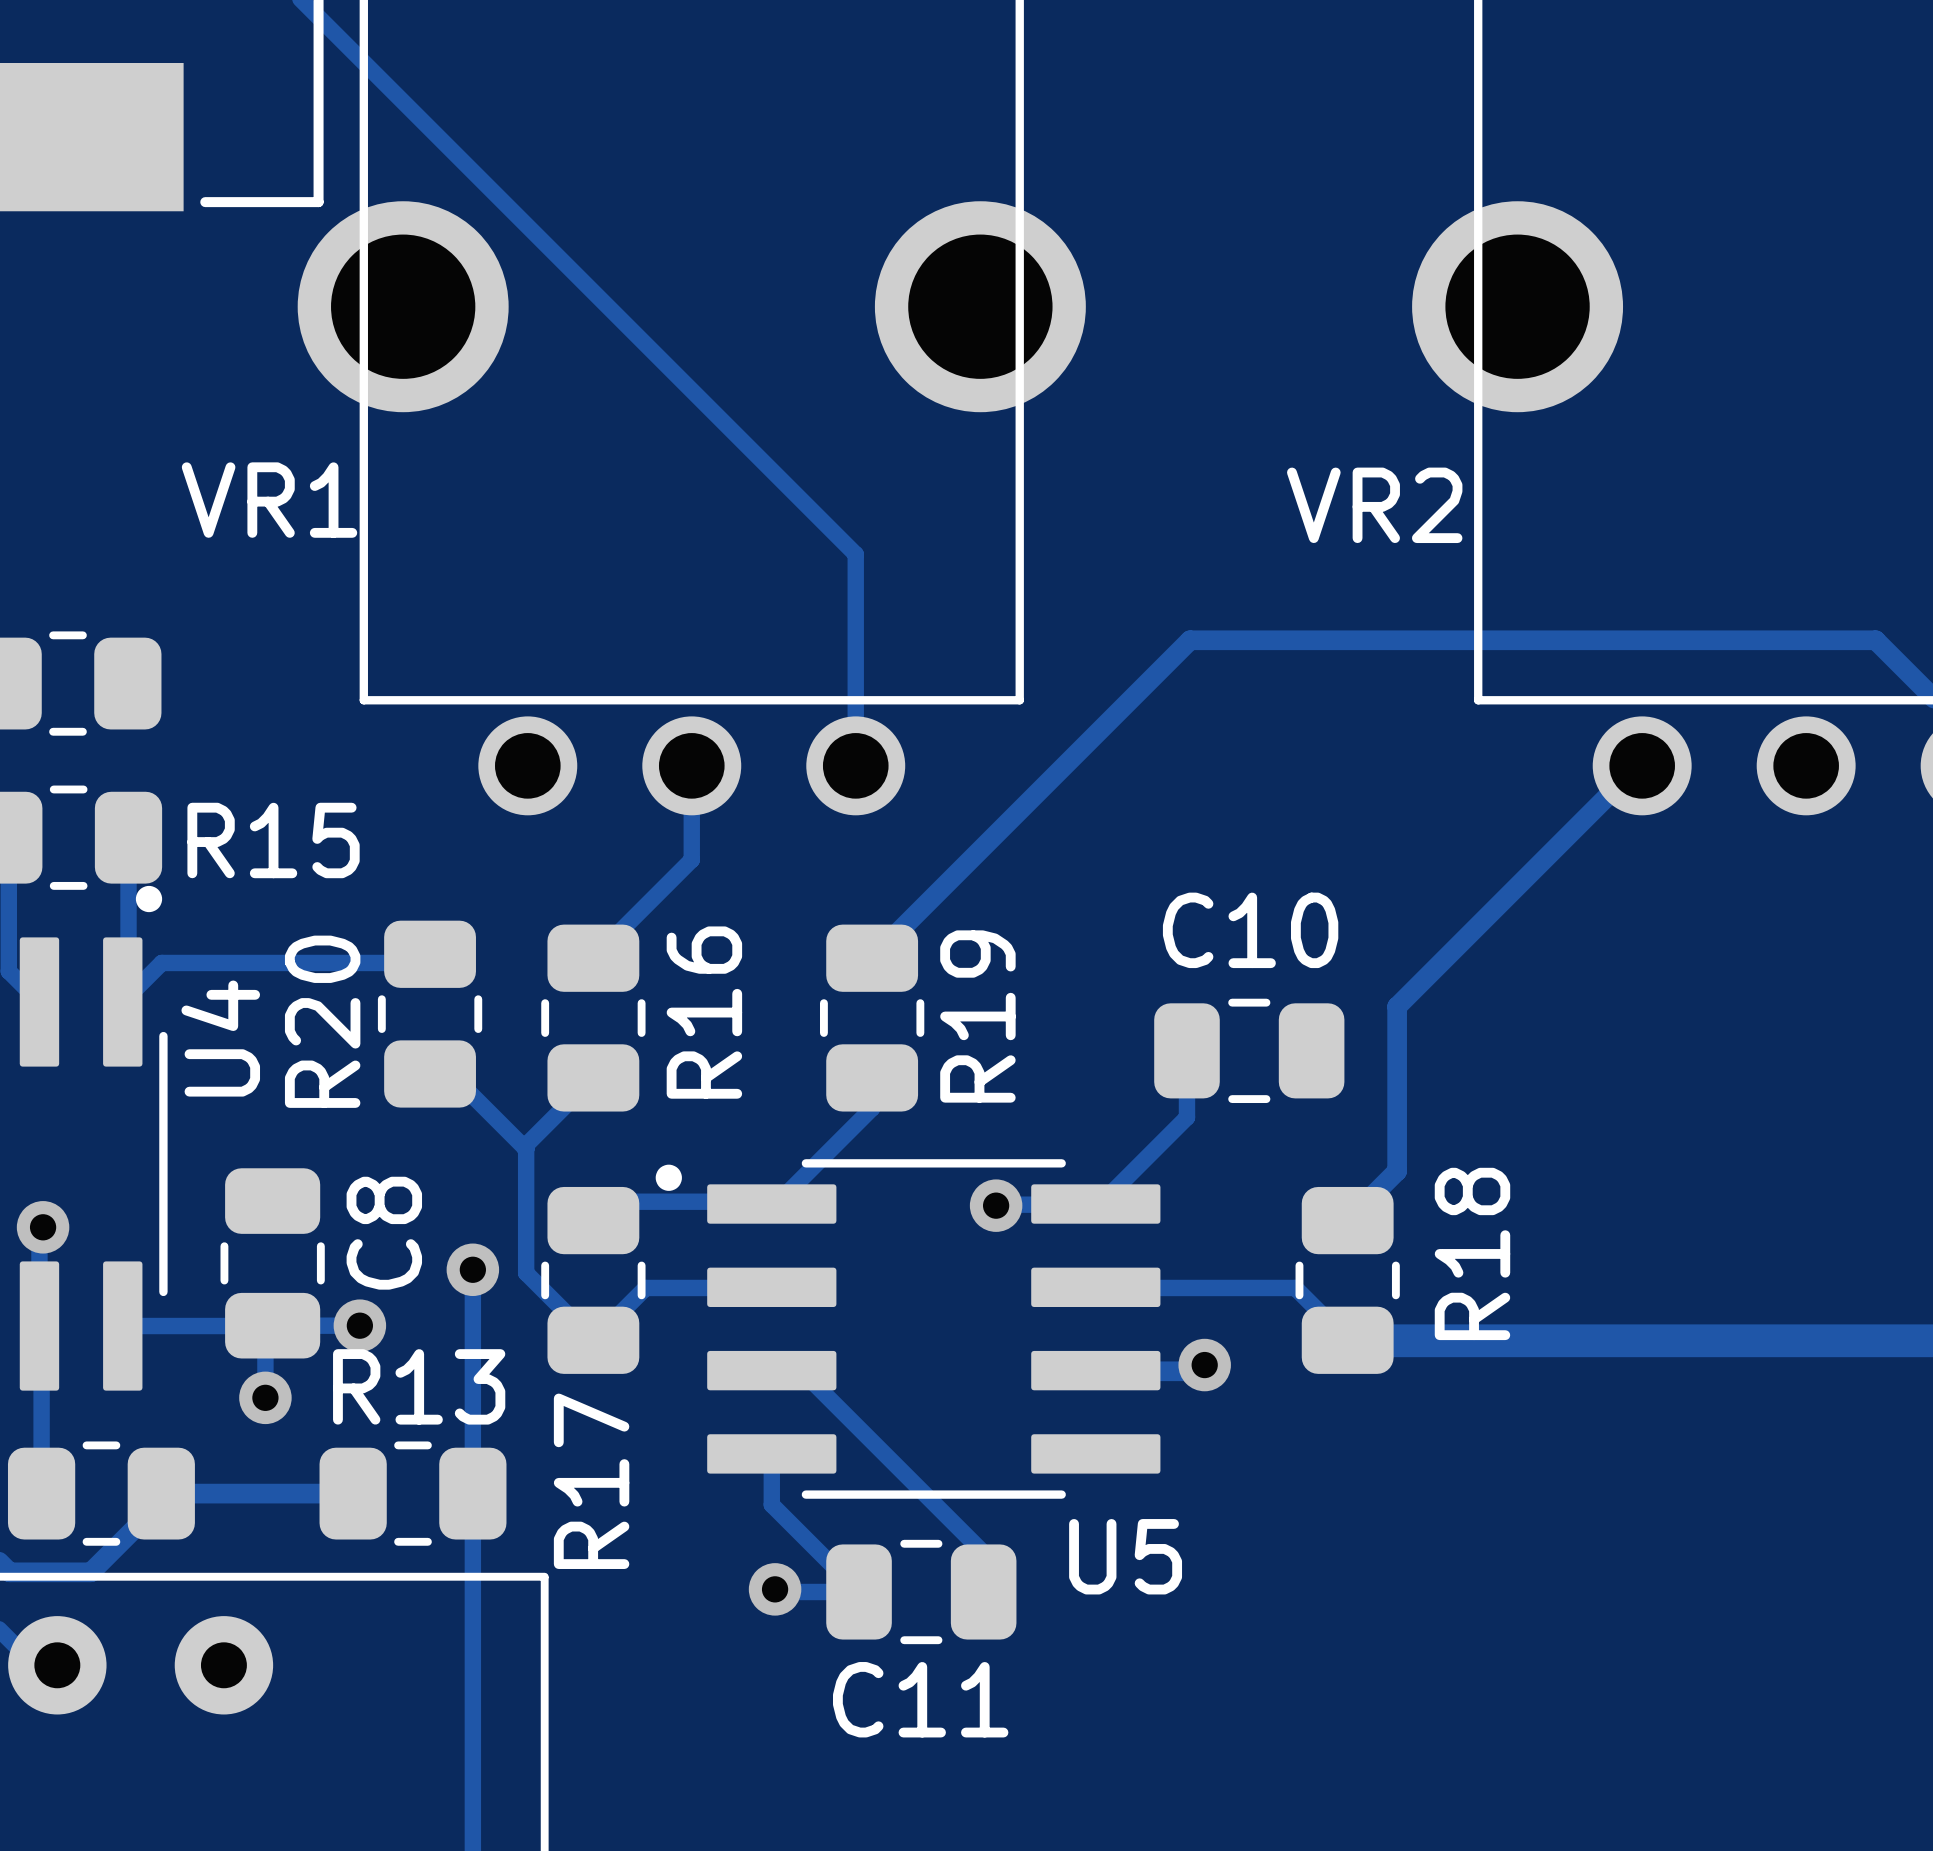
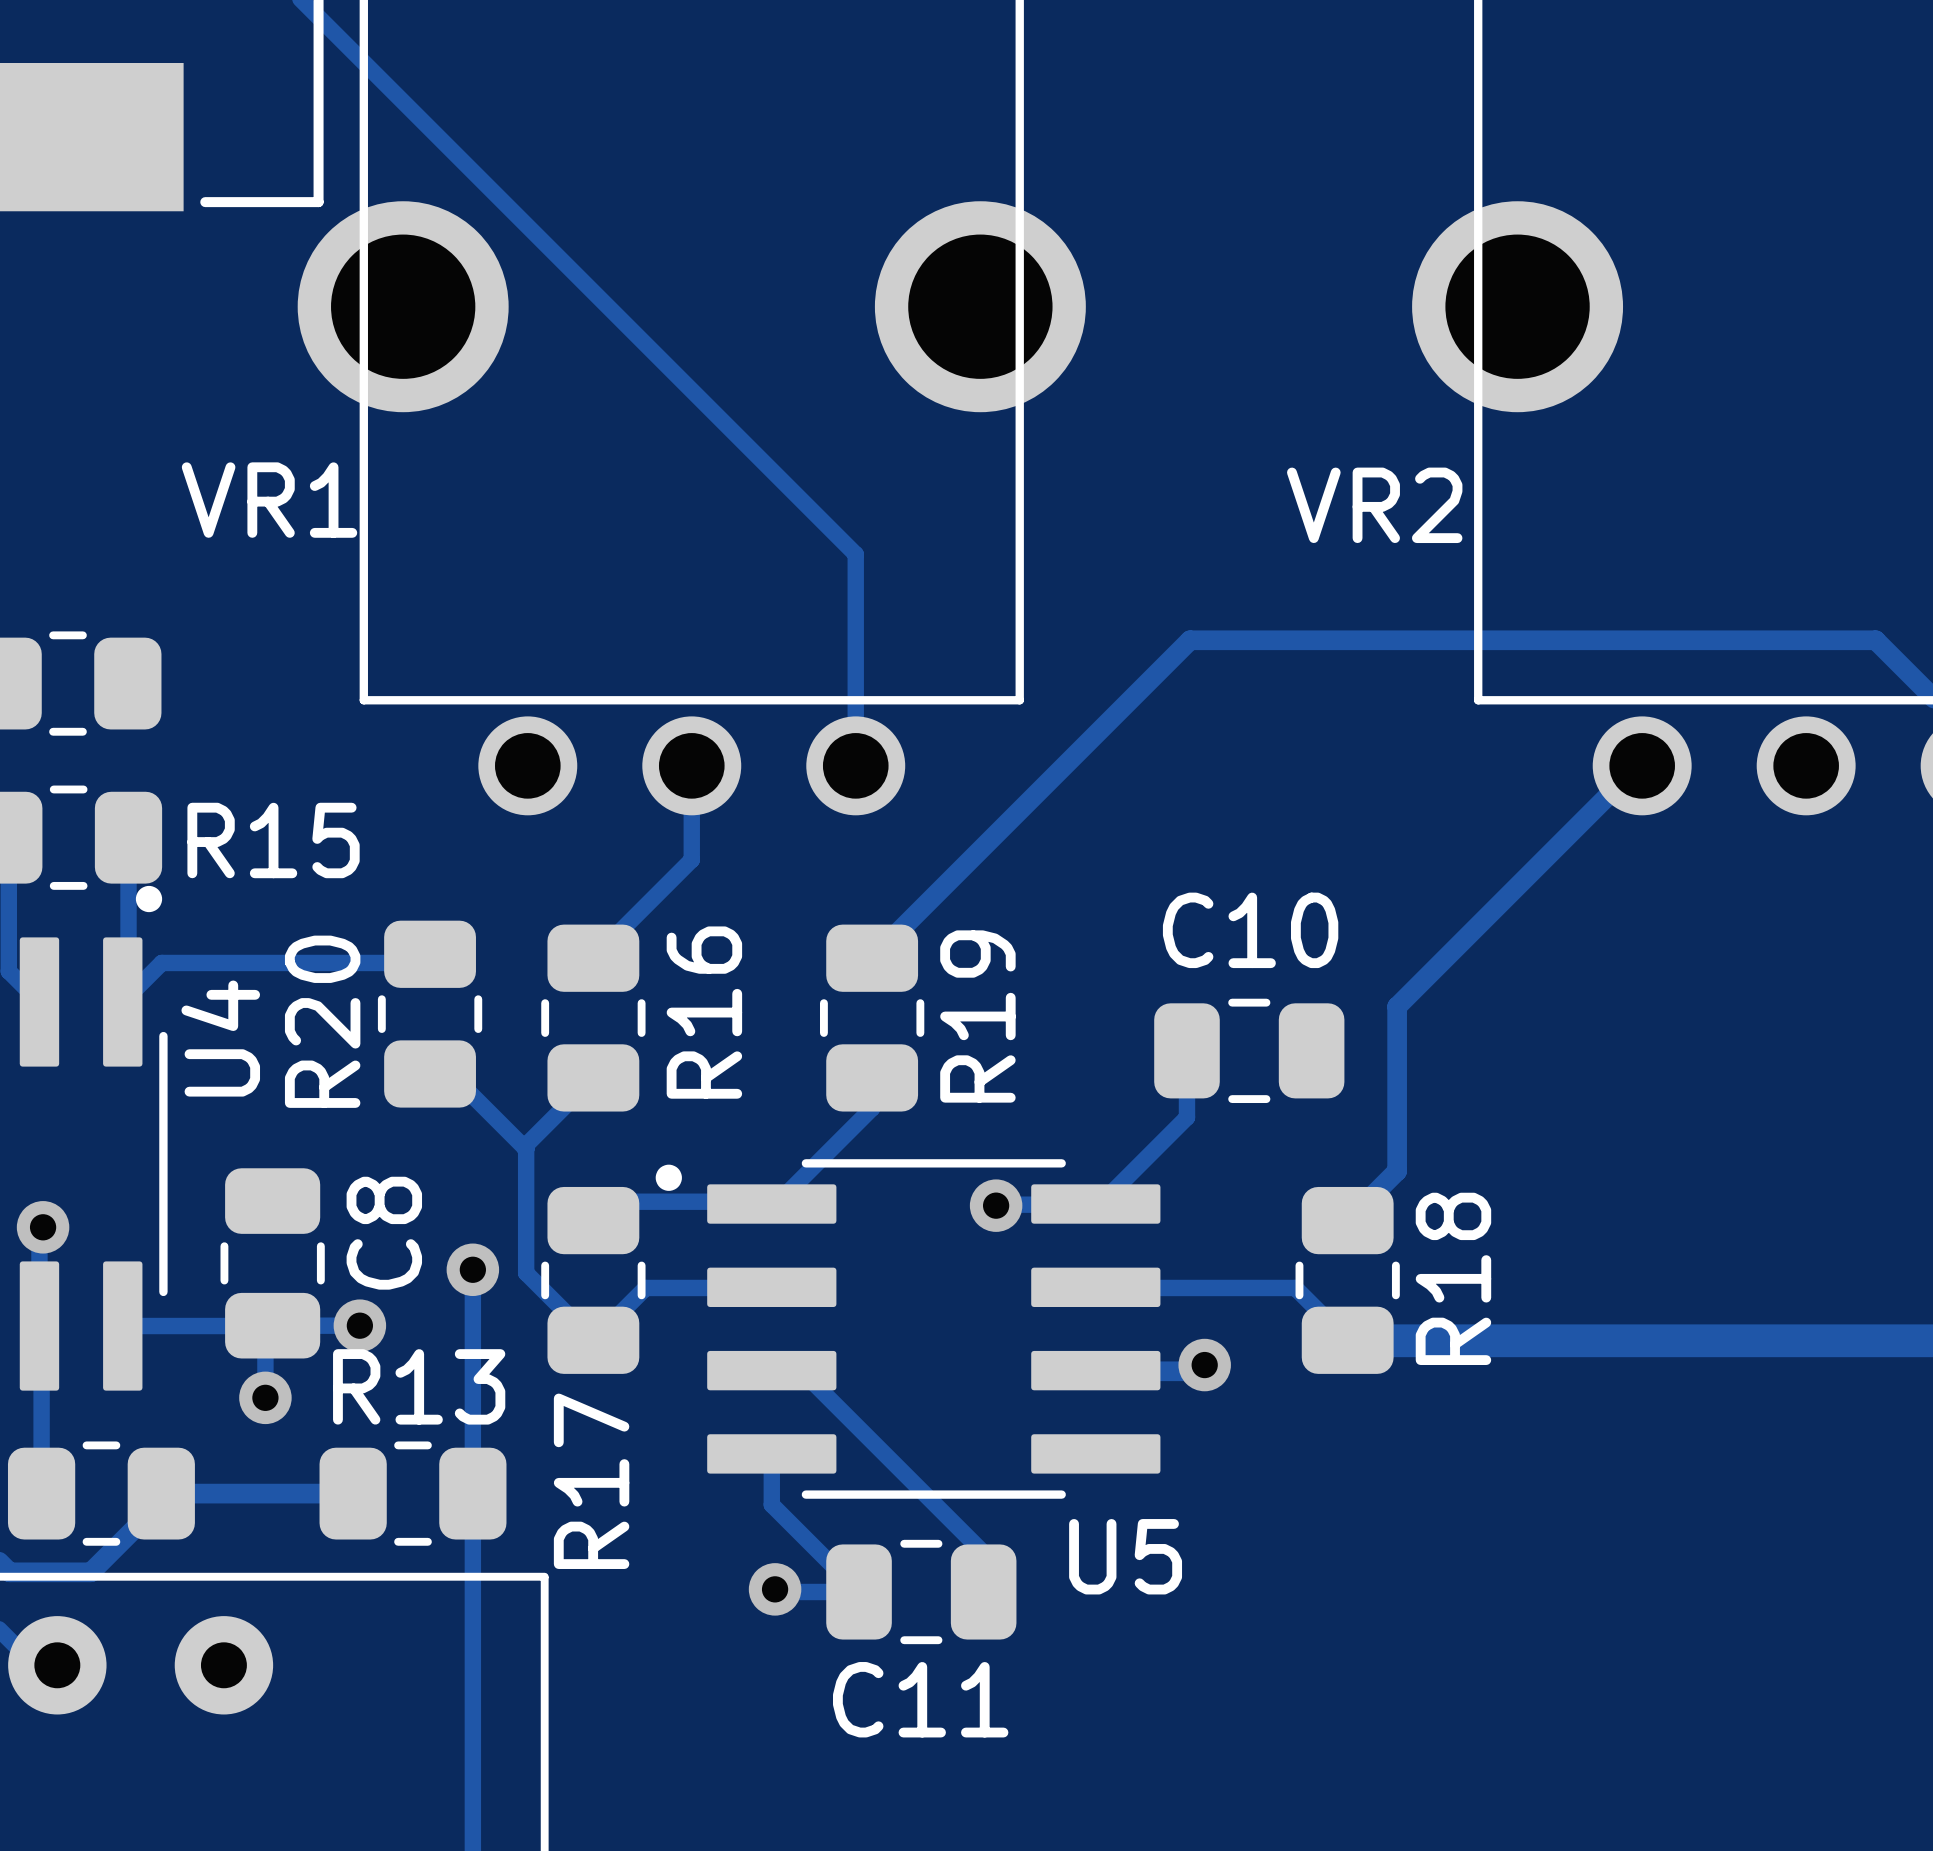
R18 name position: R18 (1472, 1253) -> R18 (1453, 1278)

